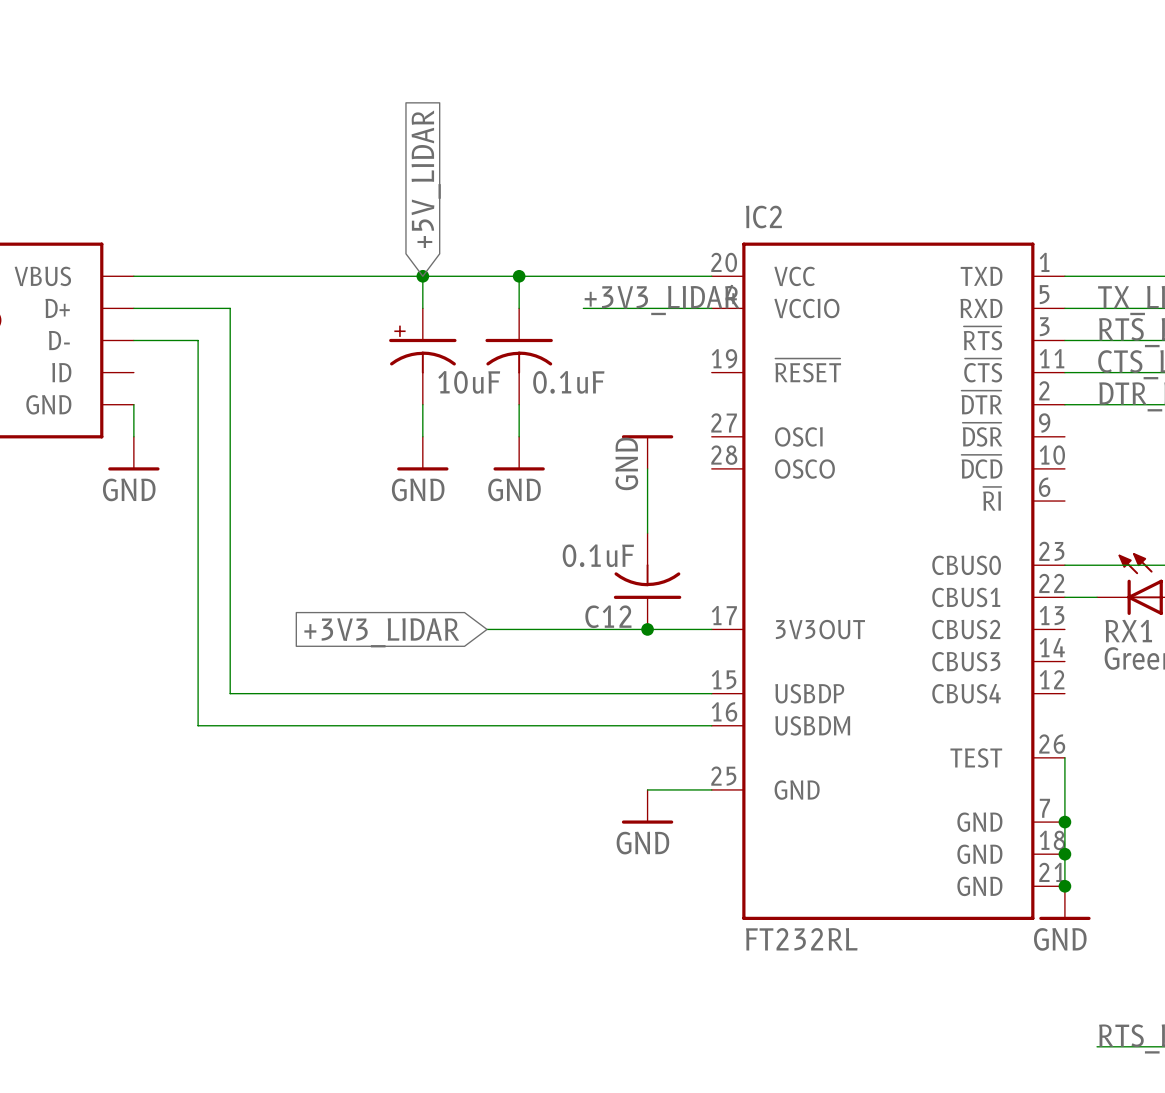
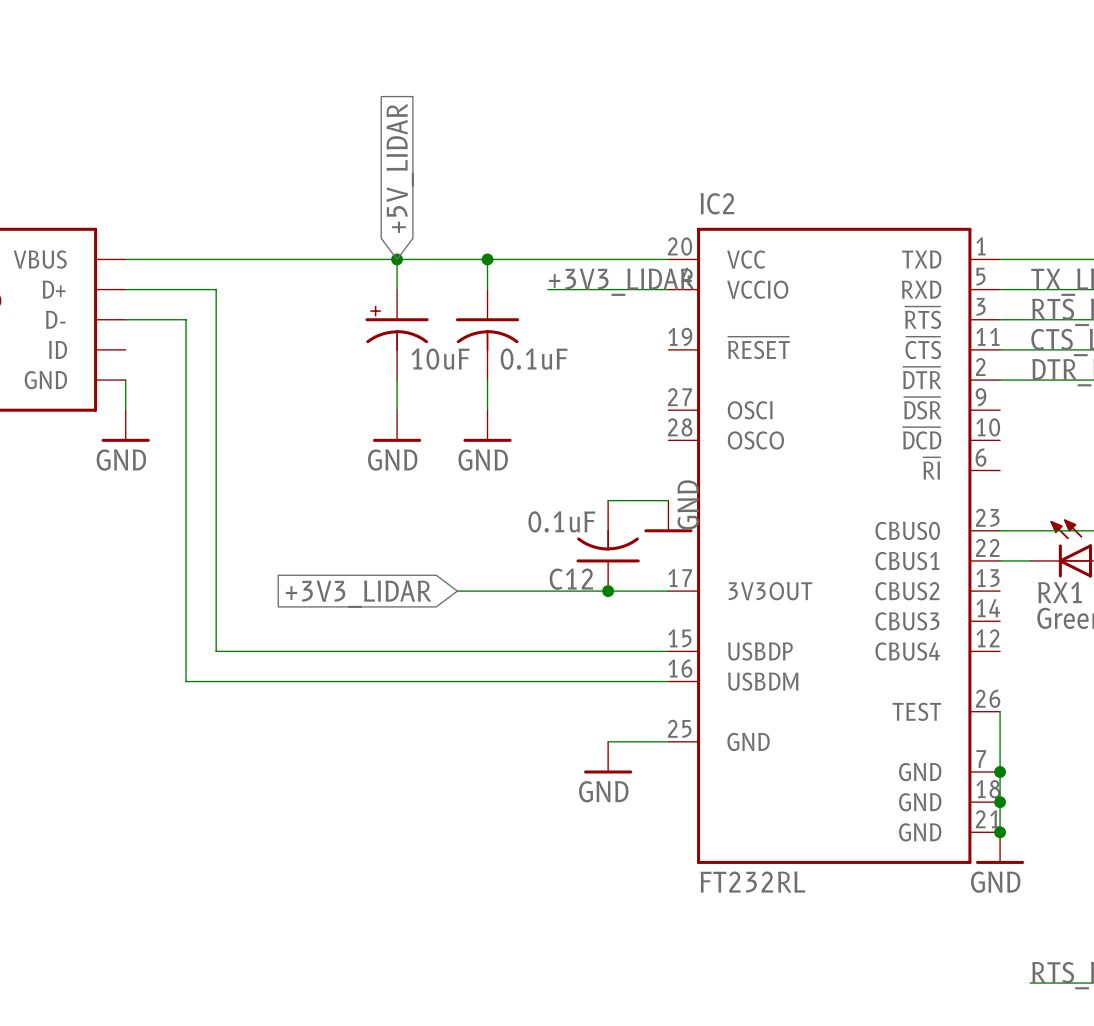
power symbol rotation: 0° (647, 436) -> 180° (668, 530)
power symbol position: GND (647, 452) -> GND (668, 516)
wire: (647, 468) (647, 533) -> (668, 500) (608, 500)

